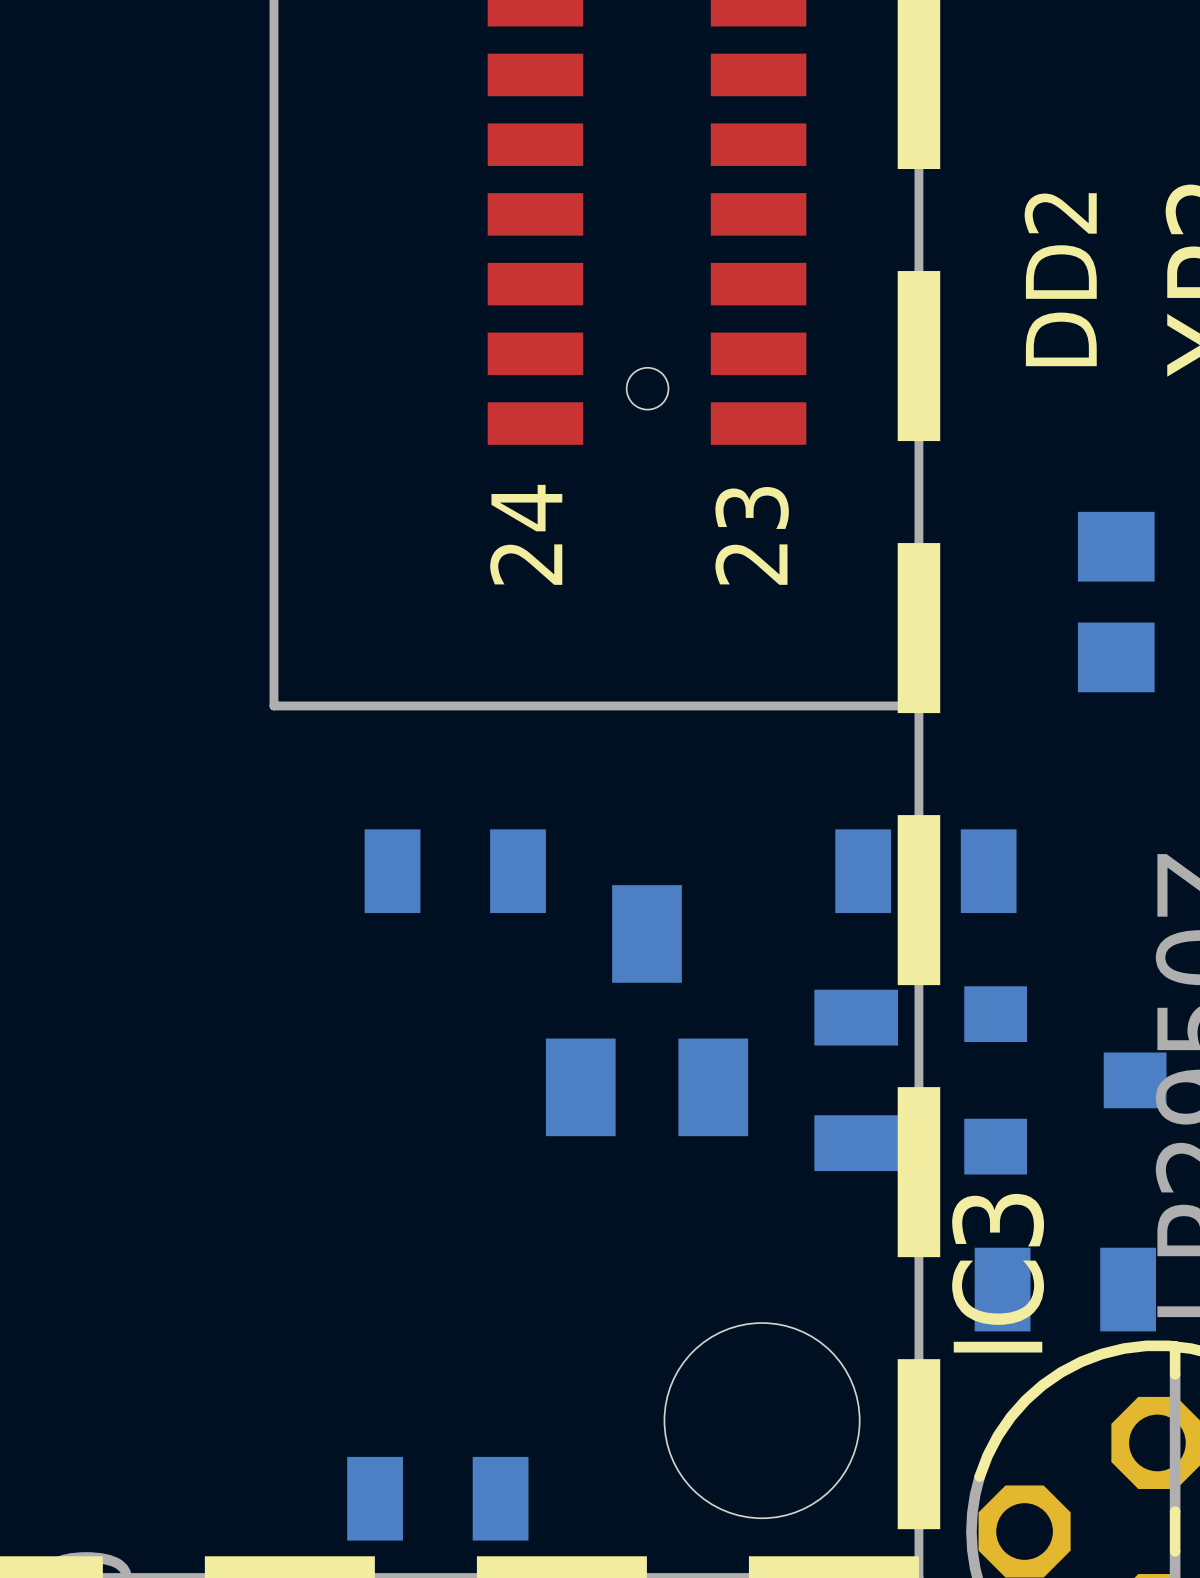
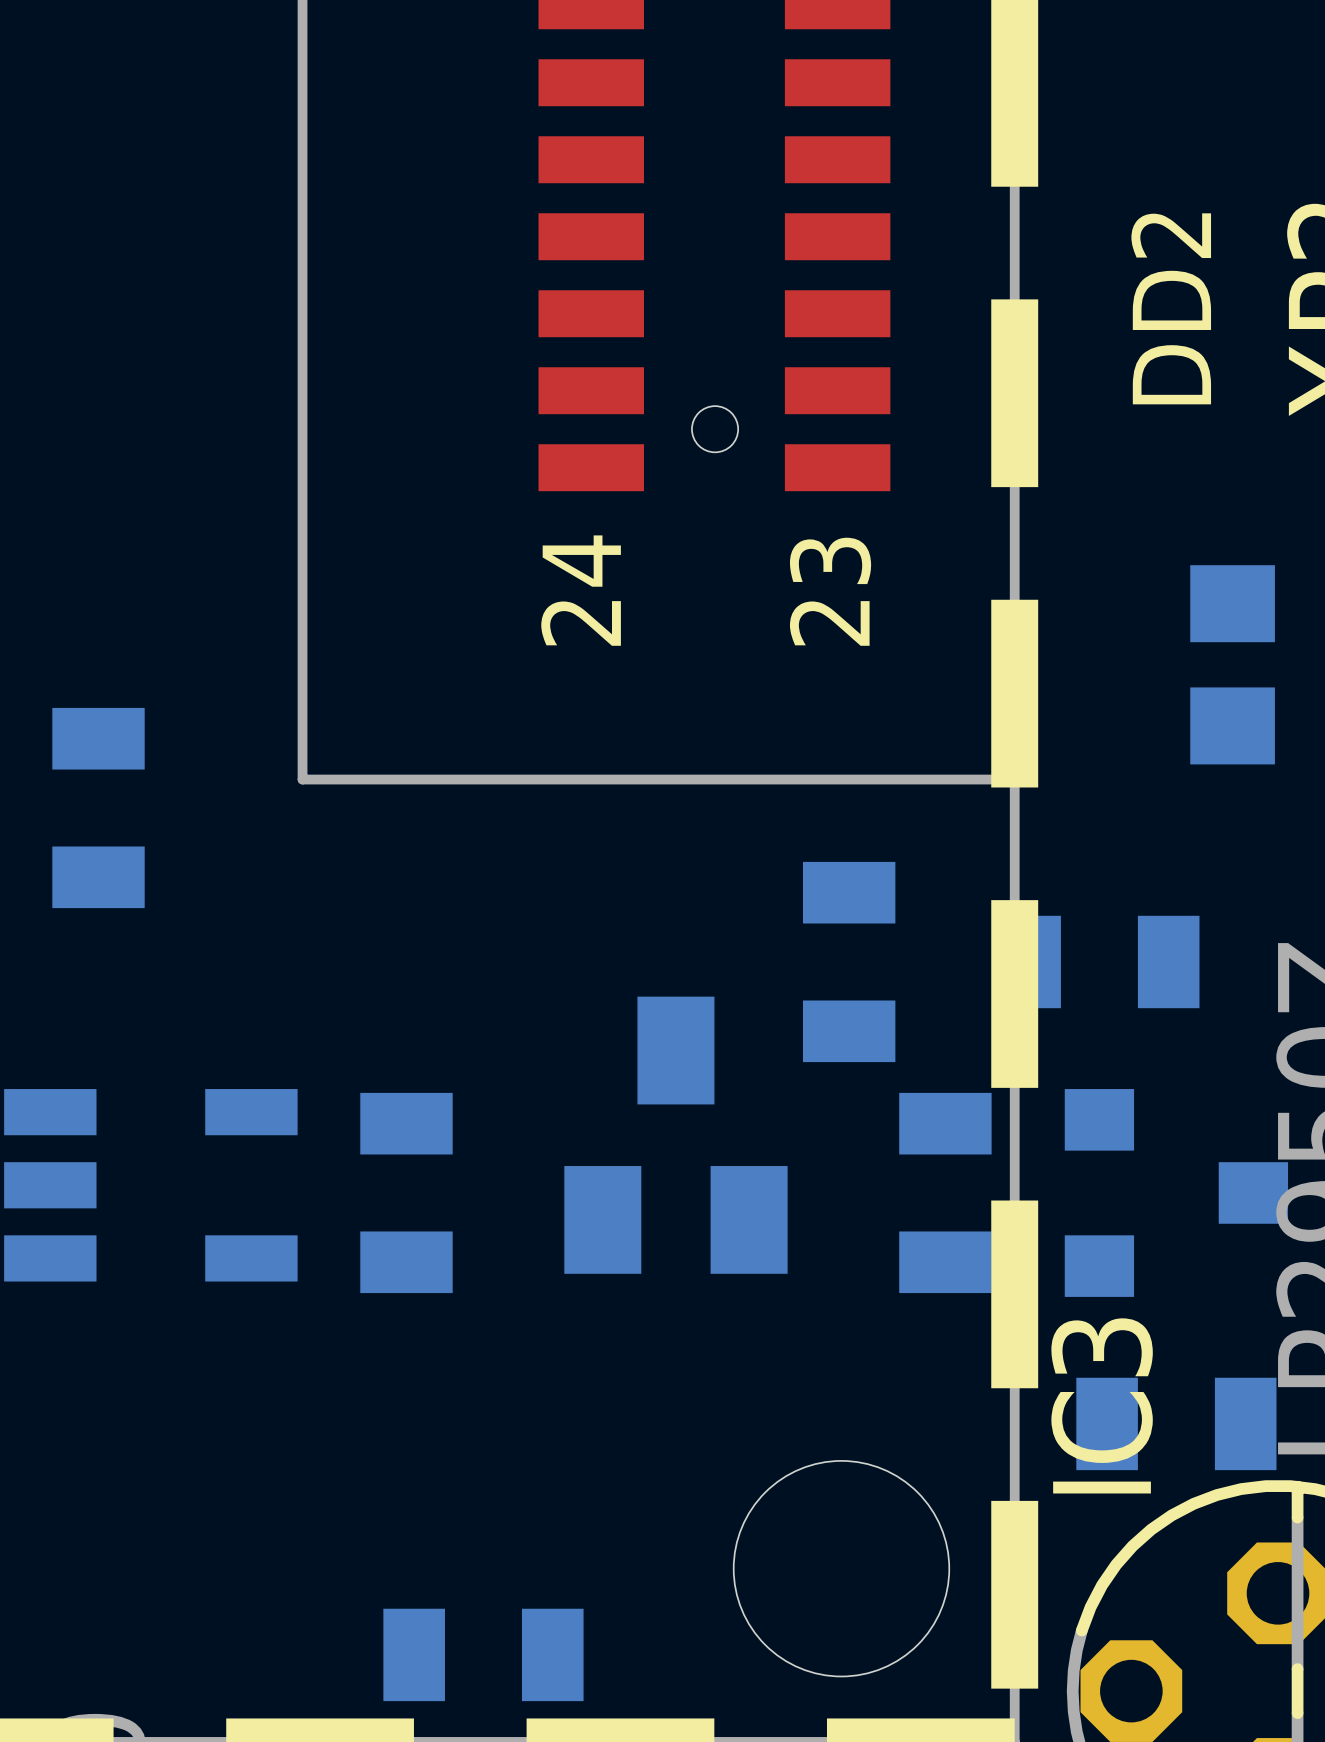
part: none -> (98, 808)
part: (455, 871) -> none
part: none -> (849, 962)
part position: (925, 871) -> (1099, 962)
part position: (647, 1010) -> (675, 1135)
part: none -> (150, 1185)
part: none -> (406, 1192)

